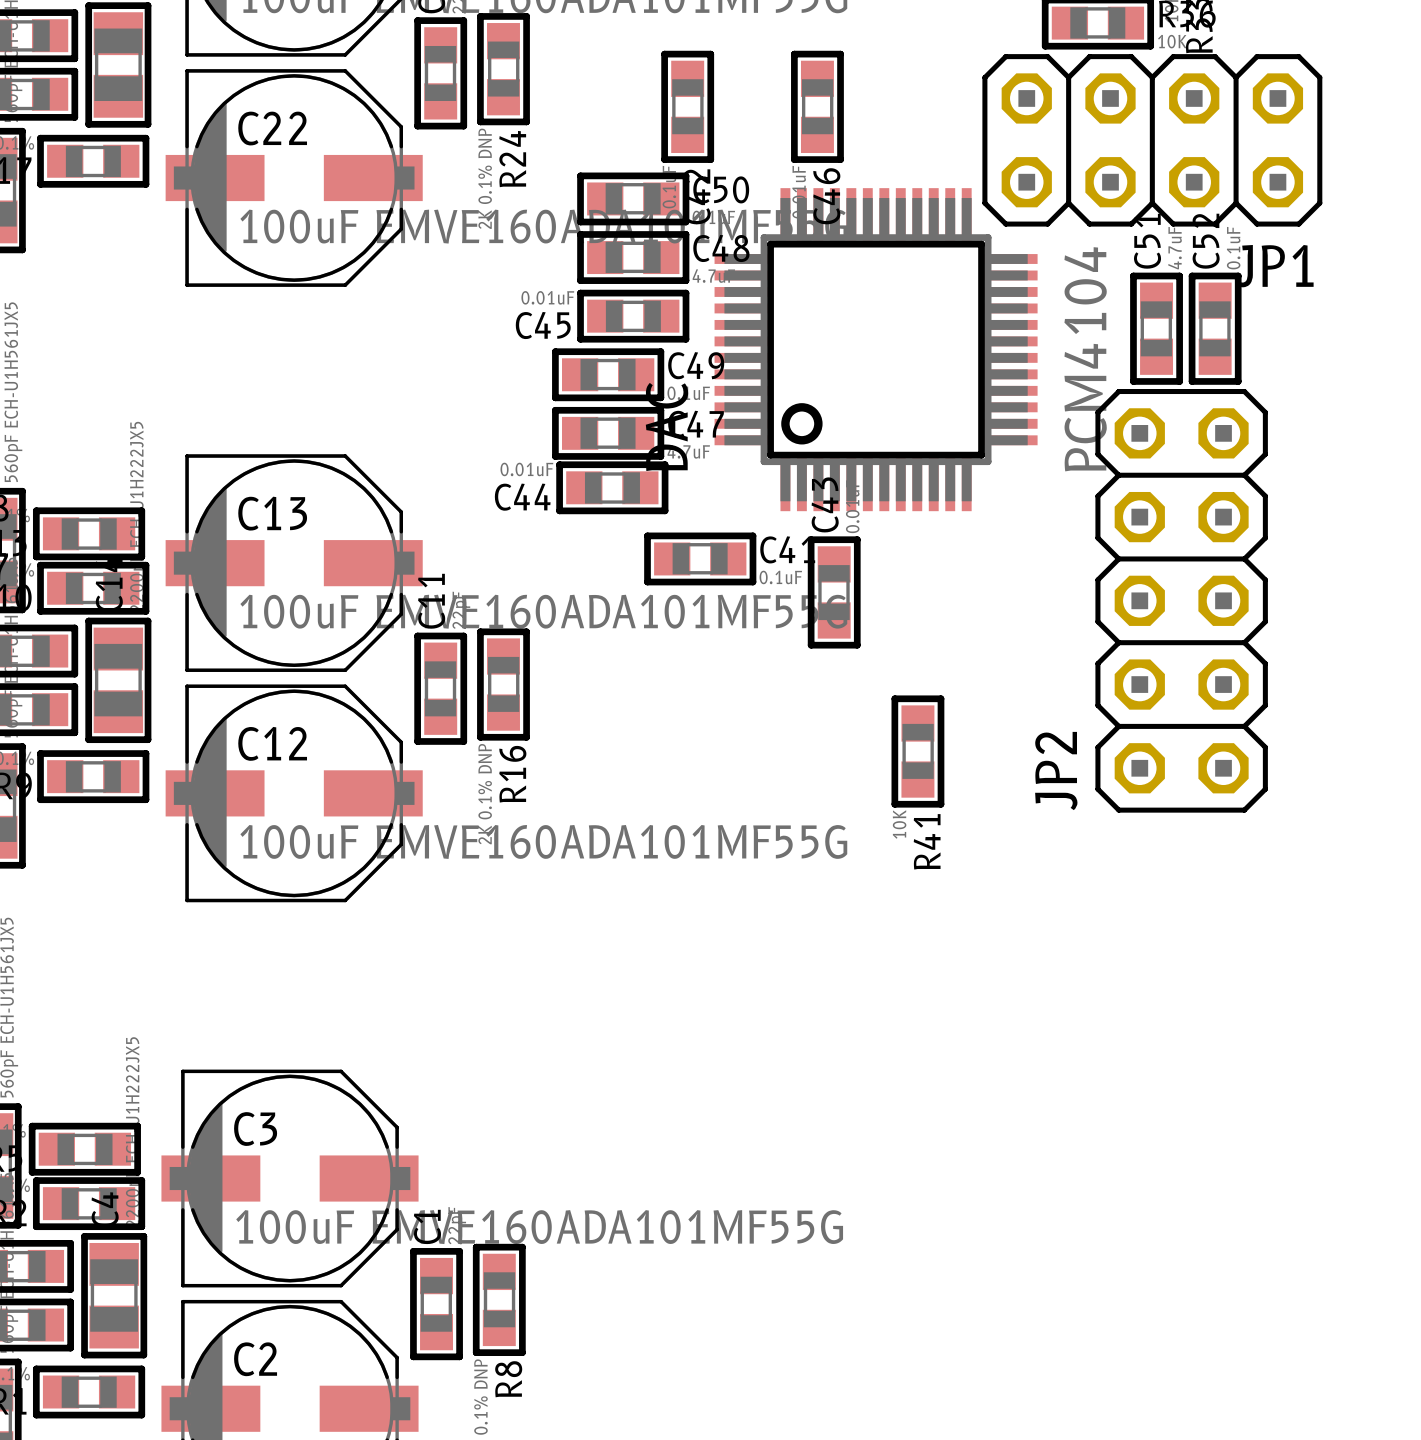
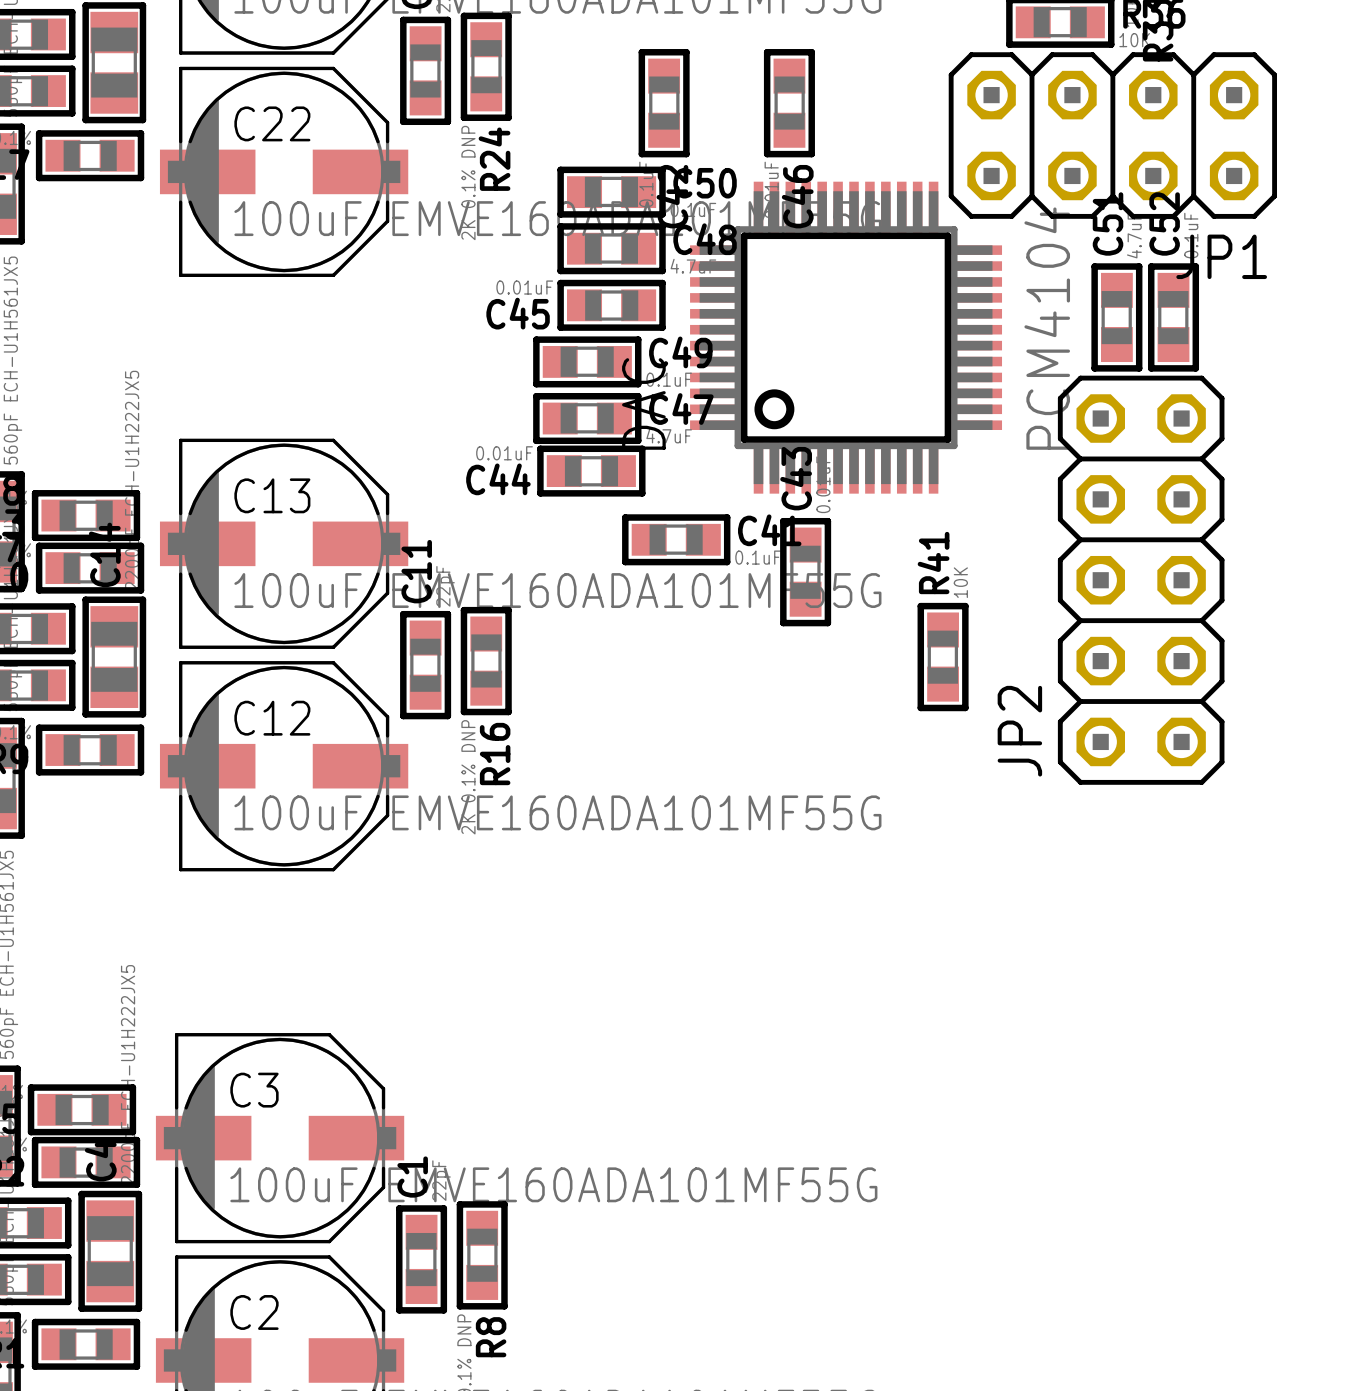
R41 position: (917, 751) -> (943, 657)
R41 value position: 10K (899, 824) -> 10K (960, 582)
R41 name position: R41 (927, 841) -> R41 (933, 563)

